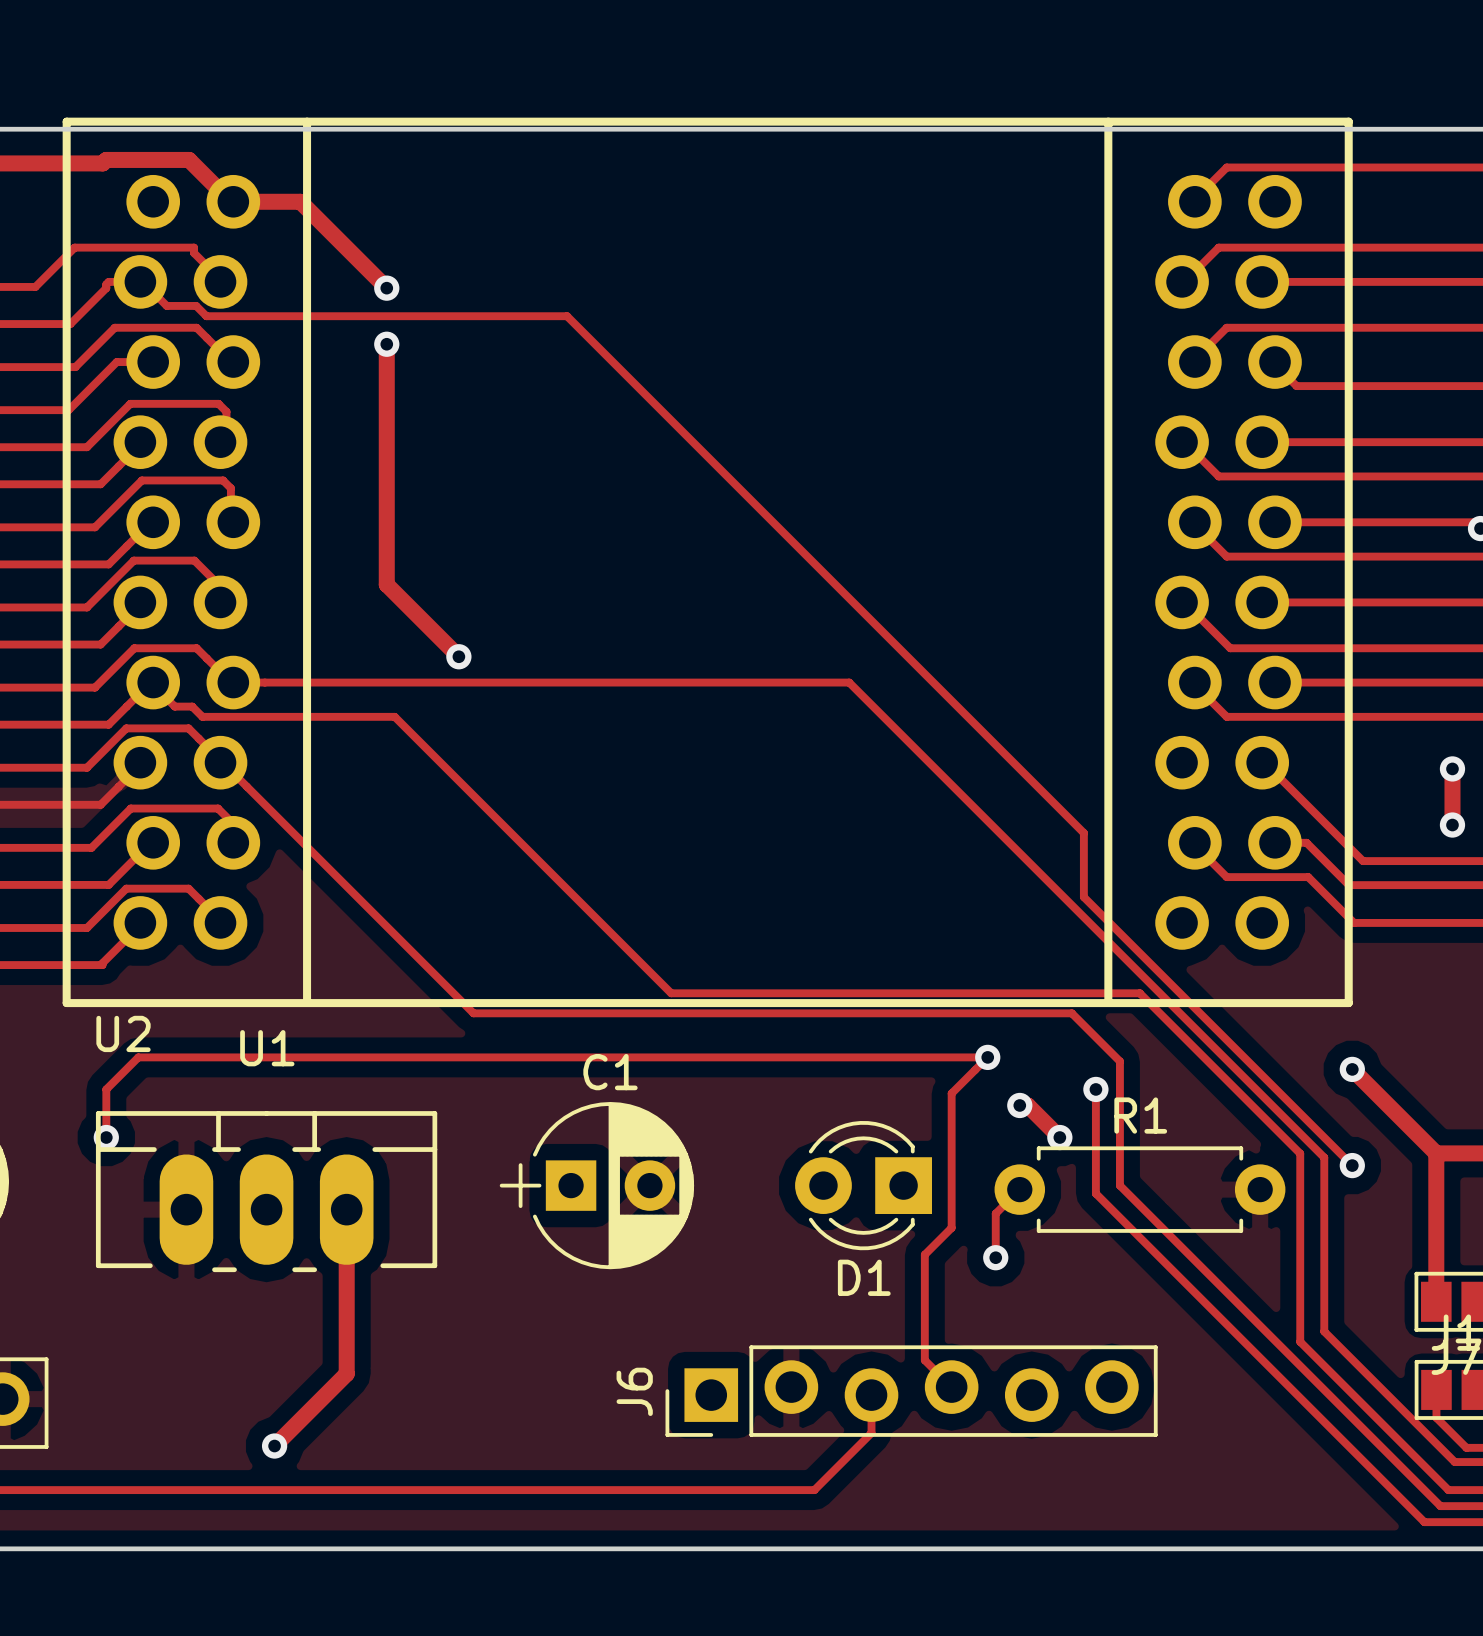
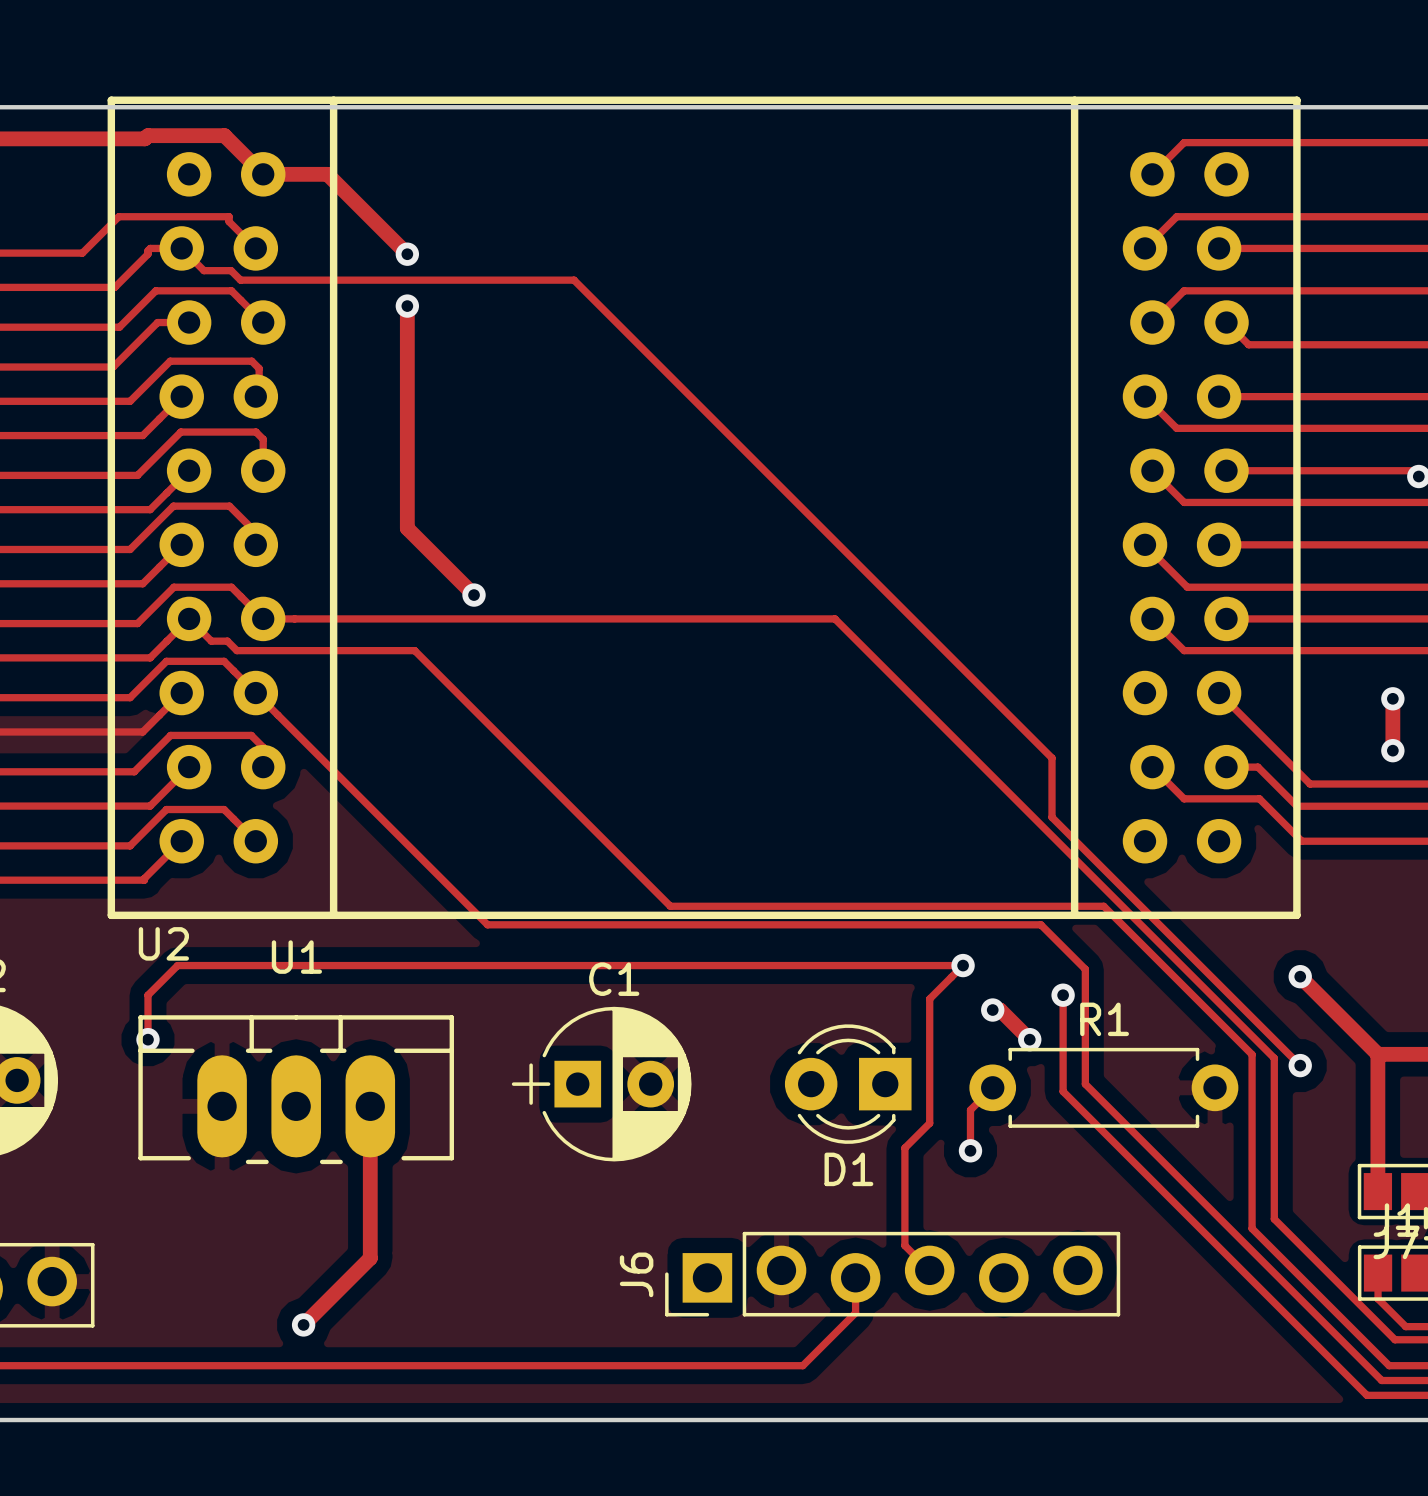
U2 footprint: [62, 117, 1353, 1008] -> [107, 96, 1301, 920]

